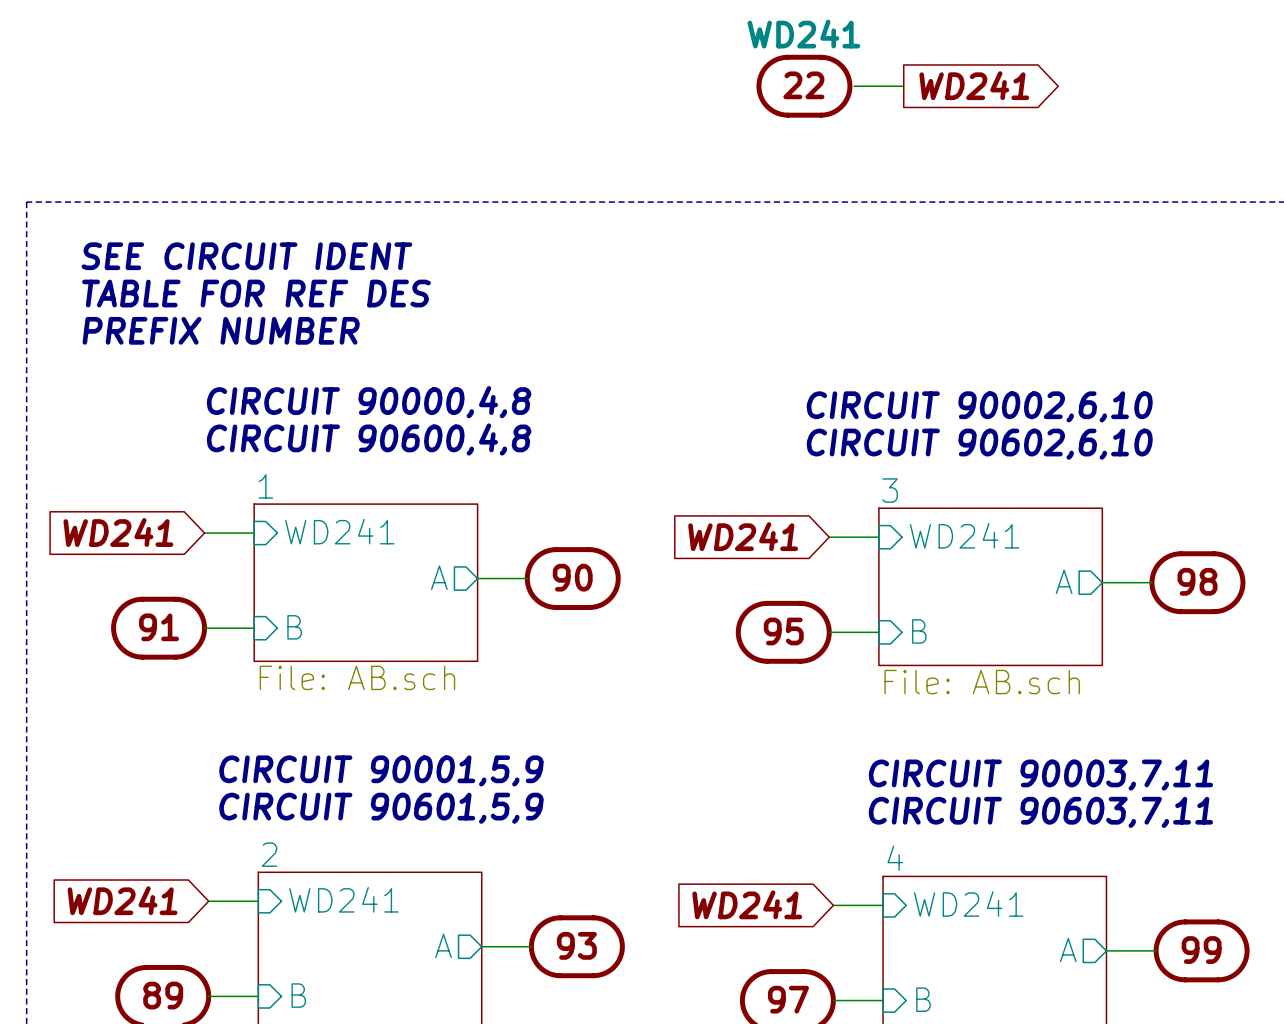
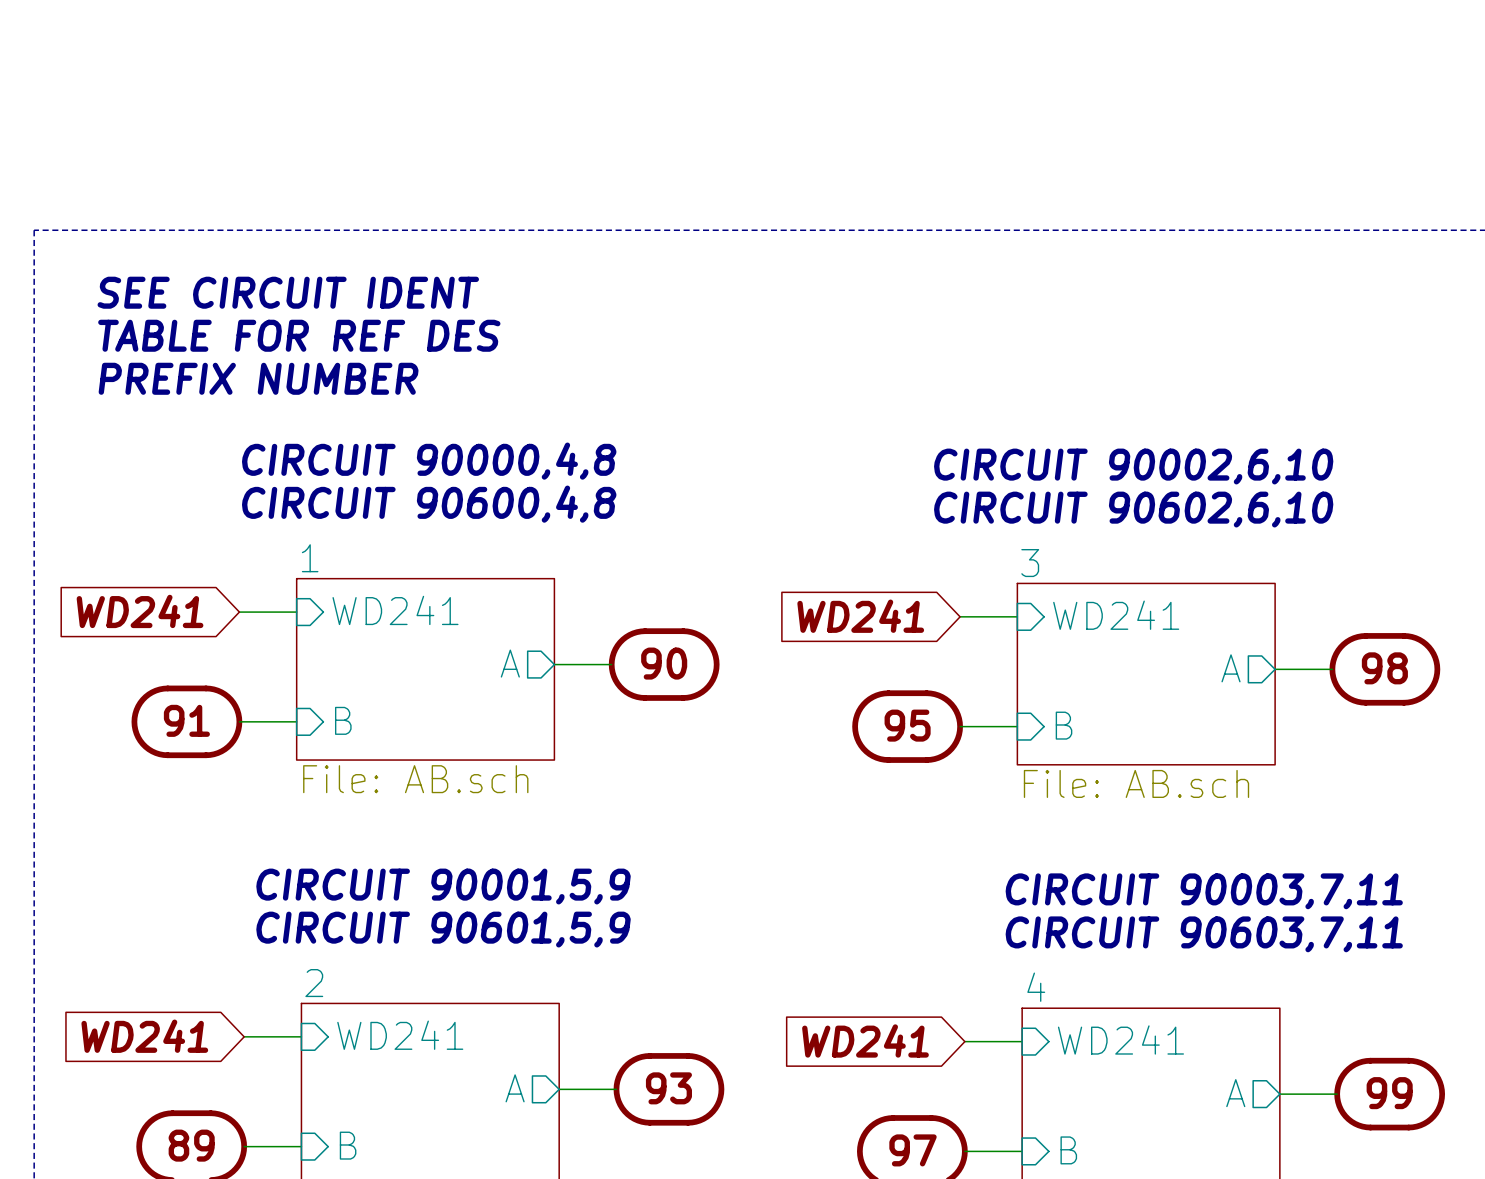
global label: WD241 (974, 85) -> none
part: (804, 86) -> none
wire: (854, 86) (903, 86) -> none

